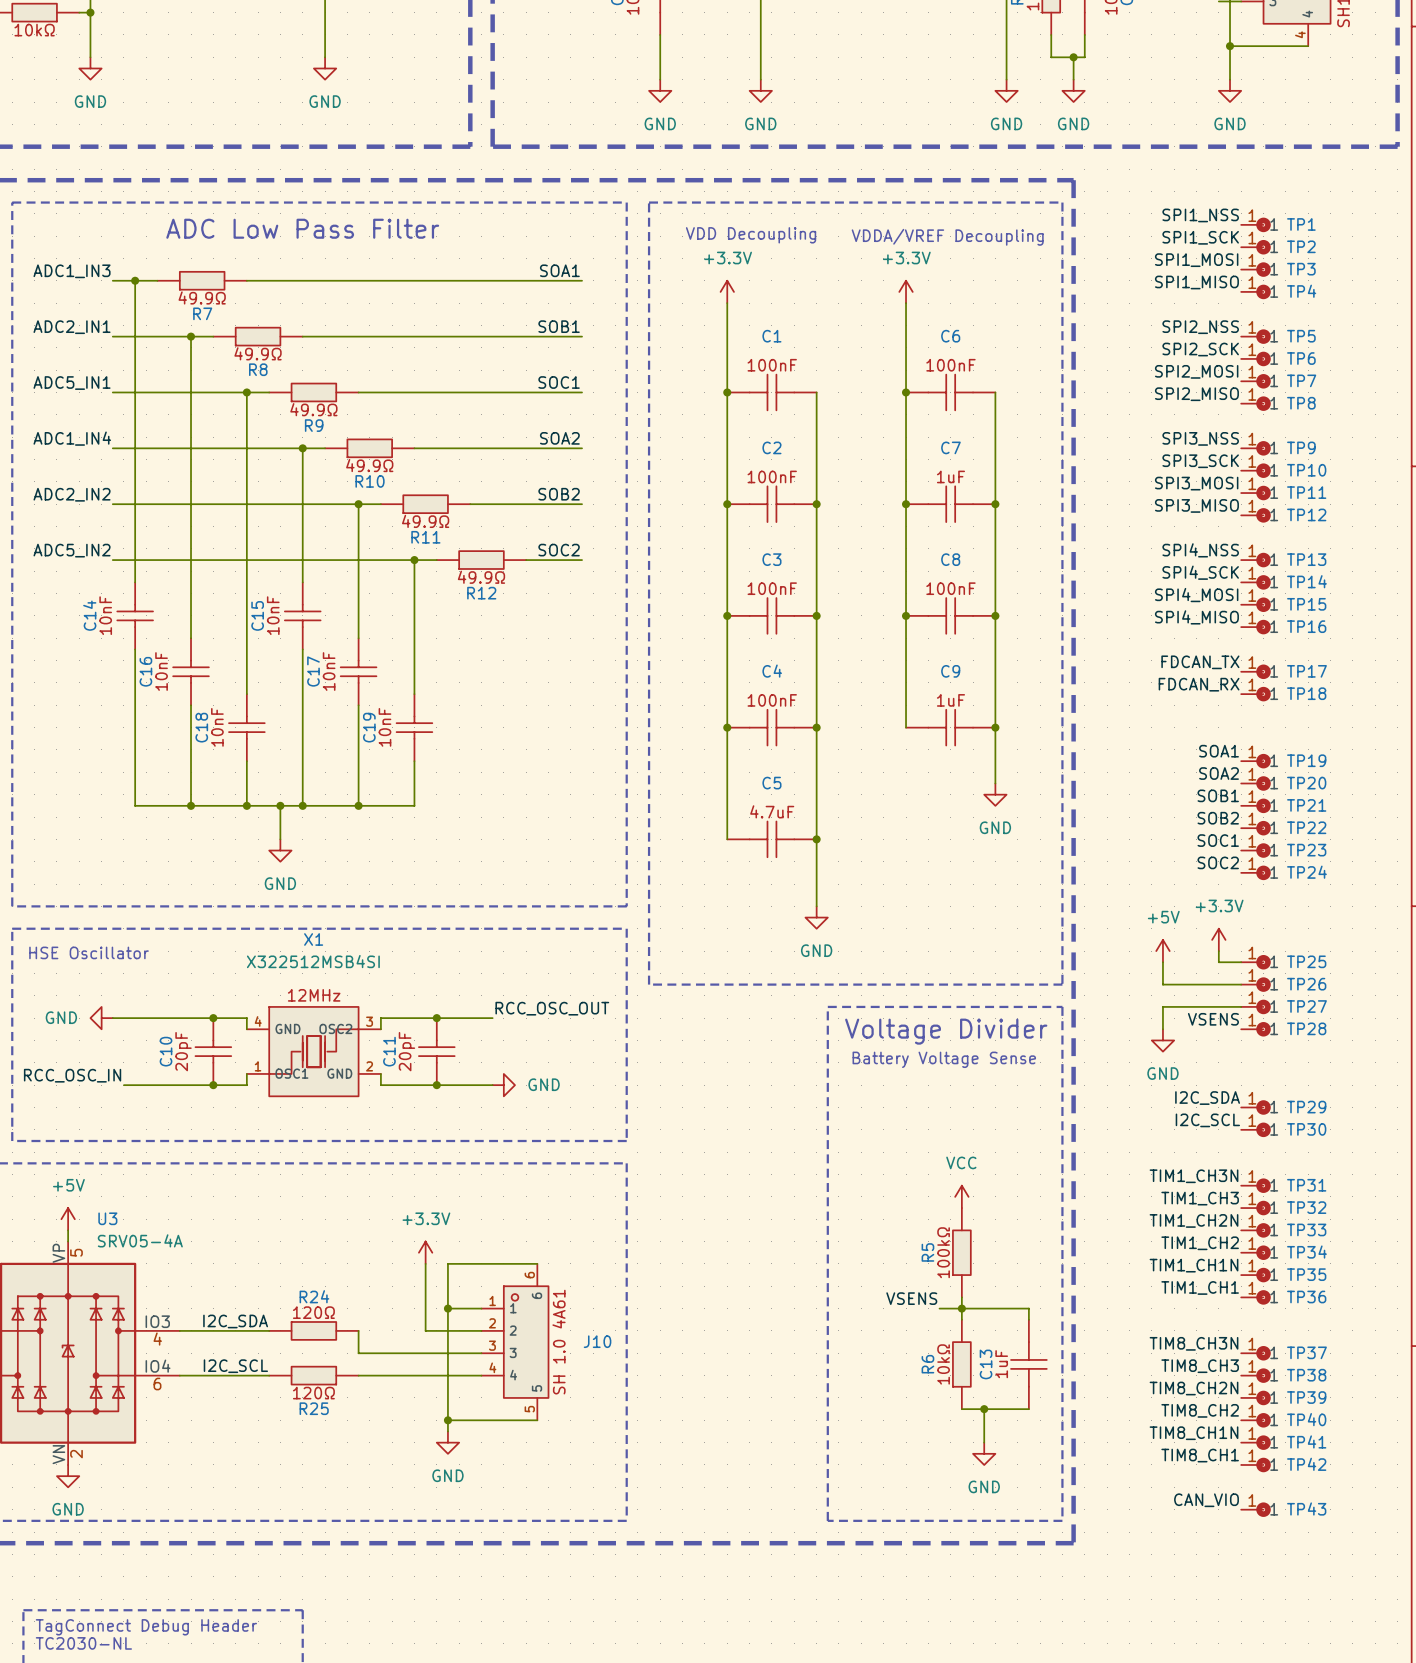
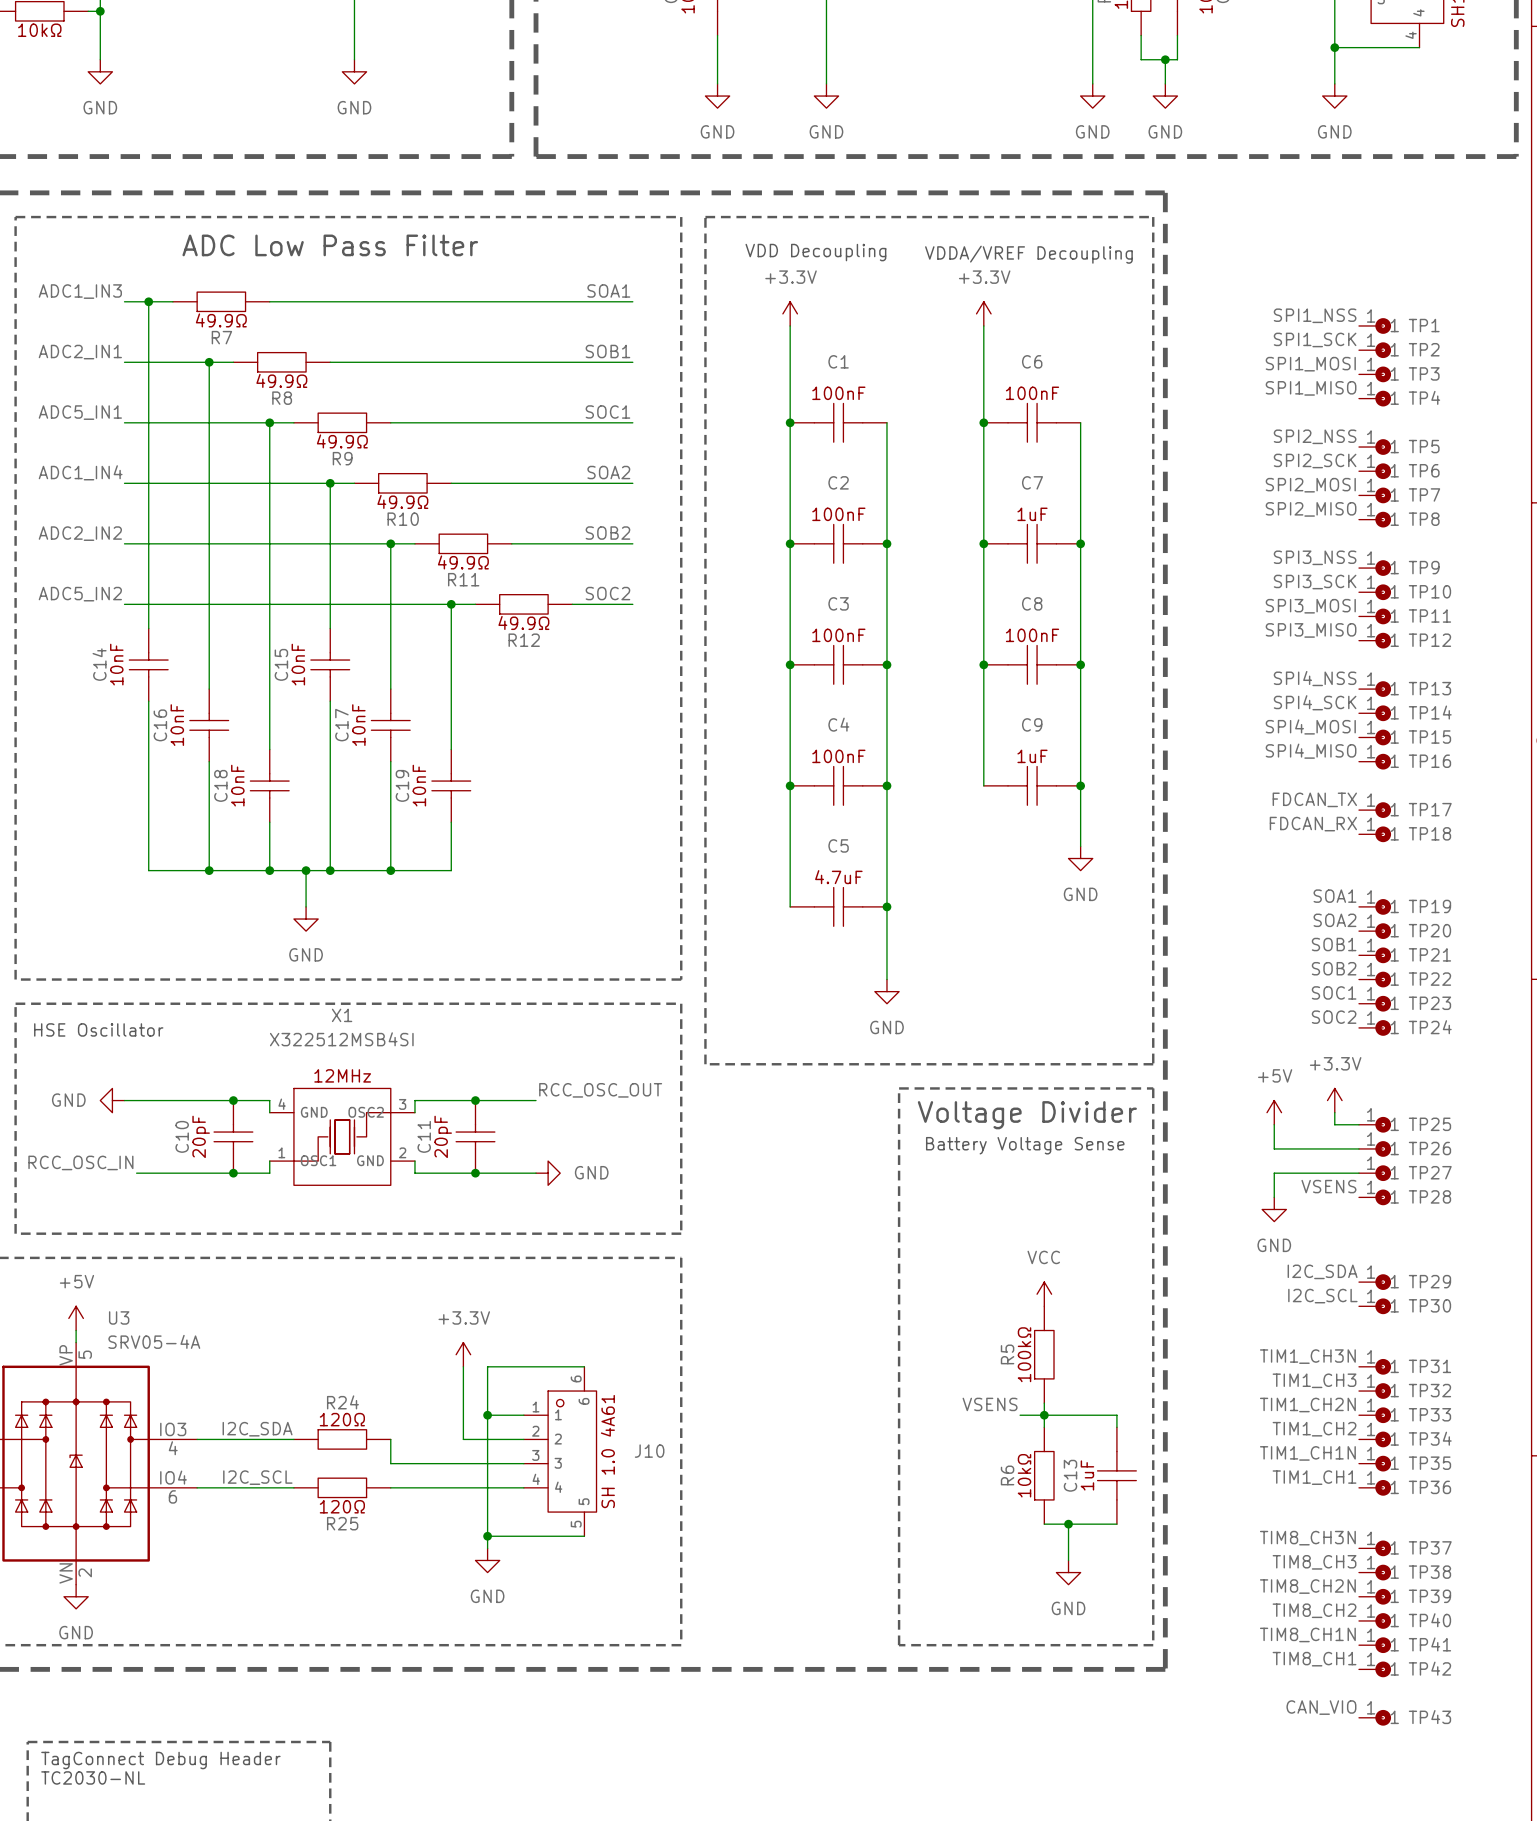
label position: SPI1_NSS (1200, 215) -> SPI1_NSS (1315, 315)
TP1 position: (1255, 224) -> (1375, 325)
label position: SPI1_SCK (1200, 237) -> SPI1_SCK (1315, 339)
TP2 position: (1255, 247) -> (1375, 350)
label position: SPI1_MOSI (1196, 260) -> SPI1_MOSI (1310, 364)
TP3 position: (1255, 269) -> (1375, 374)
label position: SPI1_MISO (1196, 282) -> SPI1_MISO (1311, 388)
TP4 position: (1255, 291) -> (1375, 398)
label position: SPI2_NSS (1200, 327) -> SPI2_NSS (1315, 436)
TP5 position: (1255, 336) -> (1375, 447)
label position: SPI2_SCK (1200, 349) -> SPI2_SCK (1315, 460)
TP6 position: (1255, 358) -> (1375, 471)
label position: SPI2_MOSI (1196, 371) -> SPI2_MOSI (1310, 485)
TP7 position: (1255, 381) -> (1375, 495)
label position: SPI2_MISO (1196, 394) -> SPI2_MISO (1311, 509)
TP8 position: (1255, 403) -> (1375, 519)
label position: SPI3_NSS (1200, 438) -> SPI3_NSS (1315, 557)
TP9 position: (1255, 448) -> (1375, 568)
label position: SPI3_SCK (1200, 461) -> SPI3_SCK (1315, 582)
TP10 position: (1255, 470) -> (1375, 592)
label position: SPI3_MOSI (1196, 483) -> SPI3_MOSI (1310, 606)
TP11 position: (1255, 493) -> (1375, 616)
label position: SPI3_MISO (1196, 505) -> SPI3_MISO (1311, 630)
TP12 position: (1255, 515) -> (1375, 640)
label position: SPI4_NSS (1200, 550) -> SPI4_NSS (1315, 678)
TP13 position: (1255, 560) -> (1375, 689)
label position: SPI4_SCK (1200, 572) -> SPI4_SCK (1315, 702)
TP14 position: (1255, 582) -> (1375, 713)
label position: SPI4_MOSI (1196, 595) -> SPI4_MOSI (1310, 726)
TP15 position: (1255, 604) -> (1375, 737)
label position: SPI4_MISO (1196, 617) -> SPI4_MISO (1311, 751)
TP16 position: (1255, 627) -> (1375, 761)
label position: FDCAN_TX (1200, 662) -> FDCAN_TX (1314, 799)
TP17 position: (1255, 671) -> (1375, 810)
label position: FDCAN_RX (1199, 684) -> FDCAN_RX (1313, 824)
TP18 position: (1255, 694) -> (1375, 834)
label position: SOA1 (1219, 751) -> SOA1 (1334, 896)
TP19 position: (1255, 761) -> (1375, 906)
label position: SOA2 (1219, 773) -> SOA2 (1334, 920)
TP20 position: (1255, 783) -> (1375, 931)
label position: SOB1 (1218, 795) -> SOB1 (1334, 944)
TP21 position: (1255, 805) -> (1375, 955)
label position: SOB2 (1218, 818) -> SOB2 (1334, 968)
TP22 position: (1255, 828) -> (1375, 979)
label position: SOC1 (1218, 840) -> SOC1 (1334, 992)
TP23 position: (1255, 850) -> (1375, 1003)
label position: SOC2 (1218, 862) -> SOC2 (1334, 1017)
TP24 position: (1255, 872) -> (1375, 1027)
power symbol position: +3.3V (1218, 939) -> +3.3V (1334, 1100)
power symbol position: +5V (1162, 951) -> +5V (1274, 1112)
wire: (1218, 951) (1218, 962) (1241, 962) -> (1334, 1112) (1334, 1124) (1358, 1124)
wire: (1162, 962) (1162, 984) (1241, 984) -> (1274, 1124) (1274, 1148) (1358, 1148)
TP25 position: (1255, 962) -> (1375, 1124)
TP26 position: (1255, 984) -> (1375, 1148)
wire: (1241, 1006) (1162, 1006) (1162, 1029) -> (1358, 1173) (1274, 1173) (1274, 1197)
TP27 position: (1255, 1006) -> (1375, 1173)
label position: VSENS (1213, 1019) -> VSENS (1328, 1186)
TP28 position: (1255, 1029) -> (1375, 1197)
power symbol position: GND (1162, 1040) -> GND (1274, 1209)
label position: I2C_SDA (1207, 1098) -> I2C_SDA (1322, 1271)
TP29 position: (1255, 1107) -> (1375, 1282)
label position: I2C_SCL (1207, 1120) -> I2C_SCL (1322, 1296)
TP30 position: (1255, 1129) -> (1375, 1306)
label position: TIM1_CH3N (1194, 1176) -> TIM1_CH3N (1307, 1356)
TP31 position: (1255, 1185) -> (1375, 1366)
label position: TIM1_CH3 (1200, 1198) -> TIM1_CH3 (1314, 1380)
TP32 position: (1255, 1208) -> (1375, 1391)
label position: TIM1_CH2N (1194, 1220) -> TIM1_CH2N (1307, 1405)
TP33 position: (1255, 1230) -> (1375, 1415)
label position: TIM1_CH2 (1200, 1243) -> TIM1_CH2 (1314, 1429)
TP34 position: (1255, 1252) -> (1375, 1439)
label position: TIM1_CH1N (1194, 1265) -> TIM1_CH1N (1307, 1453)
TP35 position: (1255, 1275) -> (1375, 1463)
label position: TIM1_CH1 (1200, 1287) -> TIM1_CH1 (1314, 1477)
TP36 position: (1255, 1297) -> (1375, 1487)
label position: TIM8_CH3N (1194, 1343) -> TIM8_CH3N (1307, 1538)
TP37 position: (1255, 1353) -> (1375, 1548)
label position: TIM8_CH3 (1200, 1366) -> TIM8_CH3 (1314, 1562)
TP38 position: (1255, 1375) -> (1375, 1572)
label position: TIM8_CH2N (1194, 1388) -> TIM8_CH2N (1307, 1586)
TP39 position: (1255, 1397) -> (1375, 1596)
label position: TIM8_CH2 (1200, 1410) -> TIM8_CH2 (1314, 1610)
TP40 position: (1255, 1420) -> (1375, 1620)
label position: TIM8_CH1N (1194, 1433) -> TIM8_CH1N (1307, 1634)
TP41 position: (1255, 1442) -> (1375, 1645)
label position: TIM8_CH1 (1200, 1455) -> TIM8_CH1 (1314, 1659)
TP42 position: (1255, 1464) -> (1375, 1669)
label position: CAN_VIO (1206, 1500) -> CAN_VIO (1321, 1707)
TP43 position: (1255, 1509) -> (1375, 1717)

